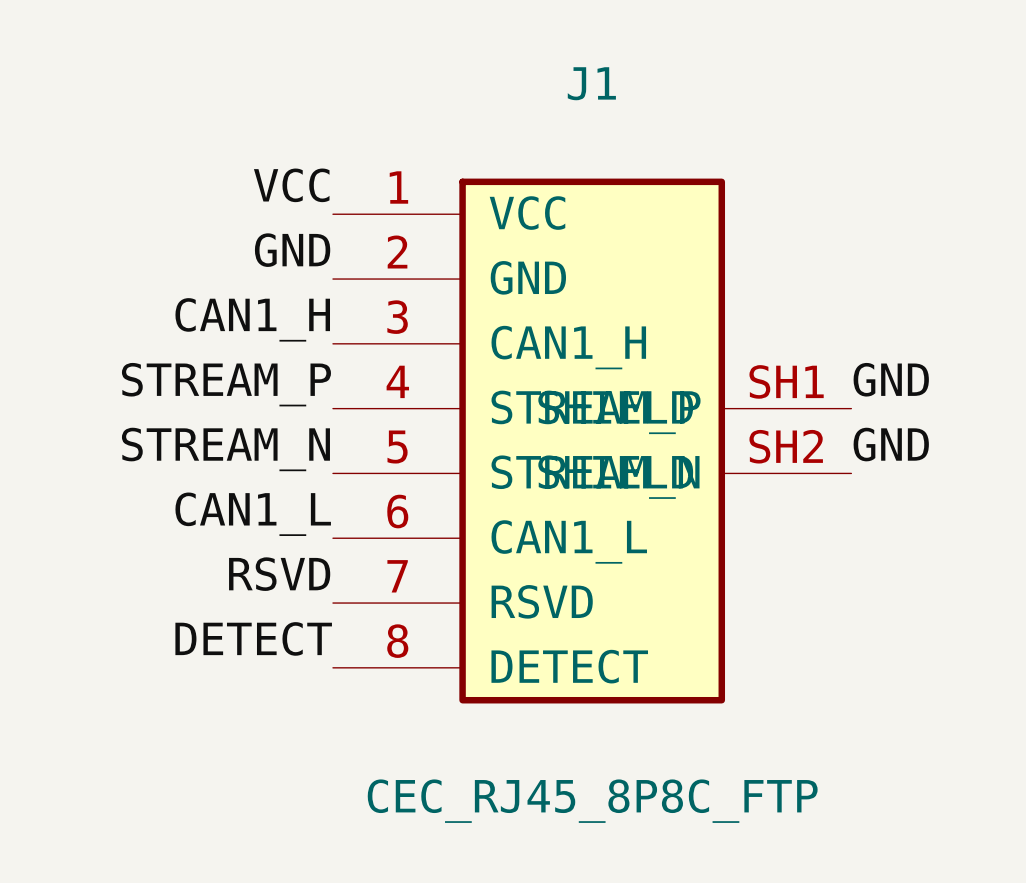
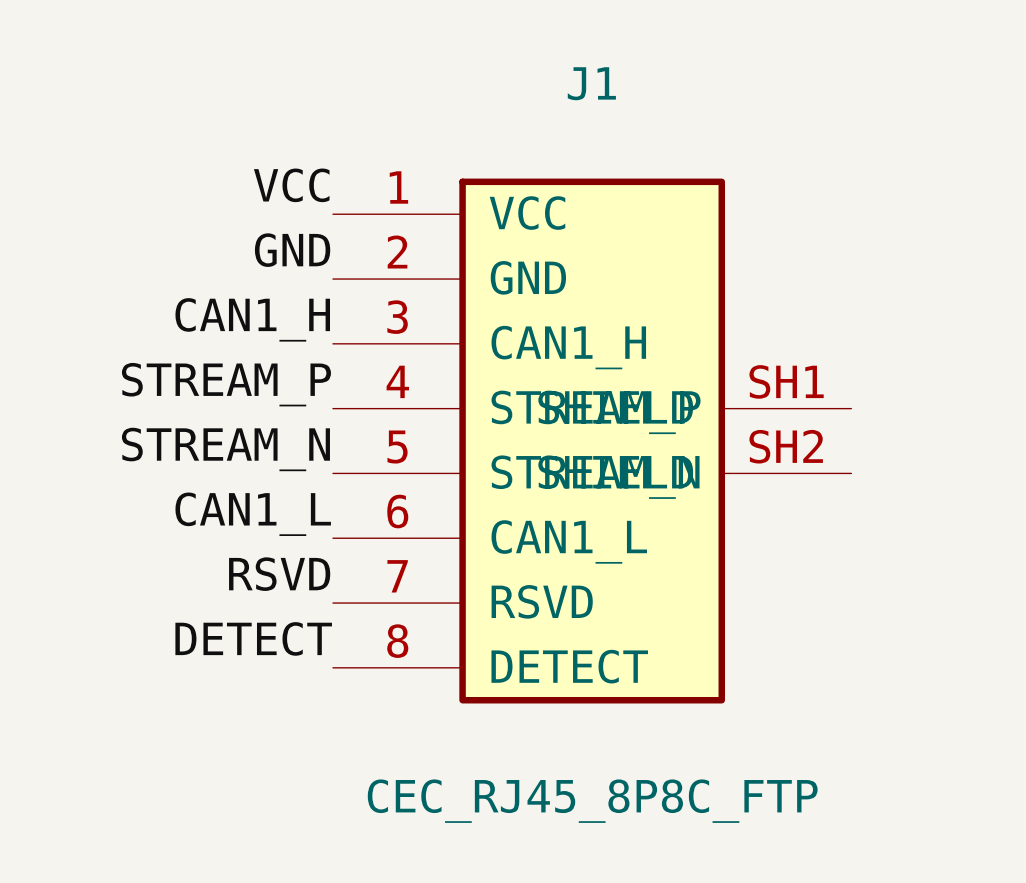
label: GND (891, 379) -> none
label: GND (891, 444) -> none

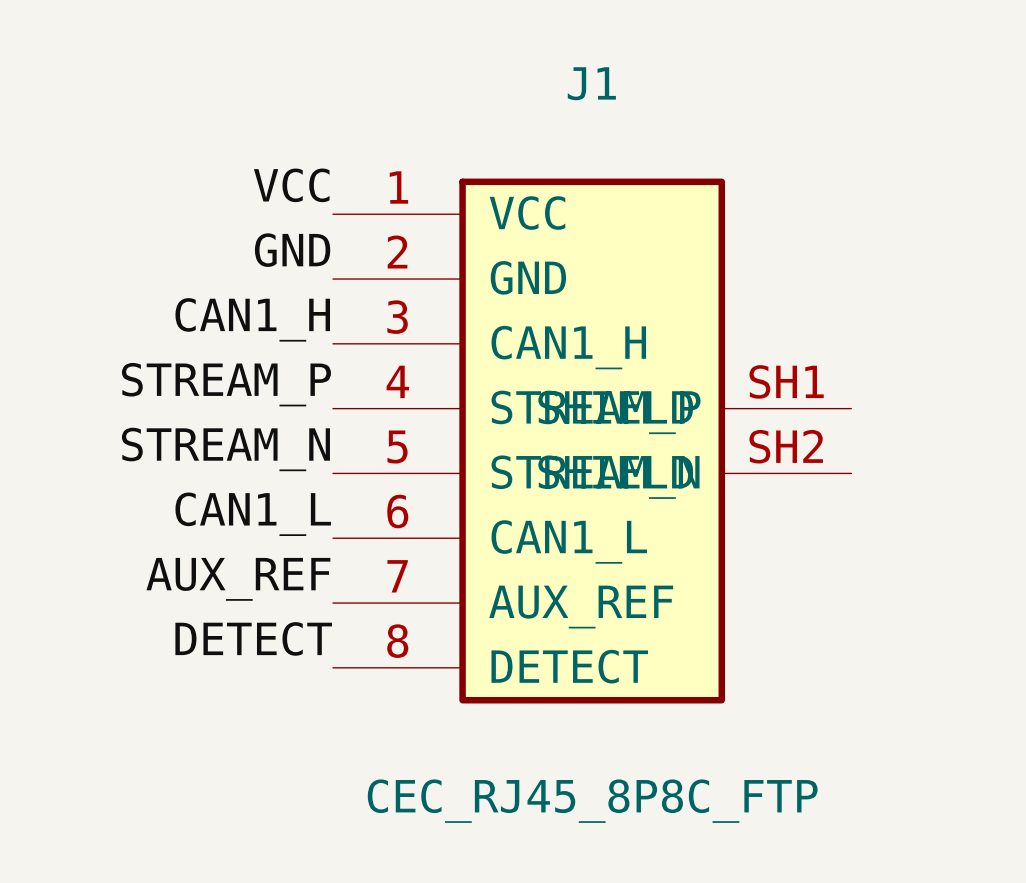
label: RSVD (279, 574) -> AUX_REF (238, 579)
J1 pin name: RSVD (542, 601) -> AUX_REF (581, 607)

